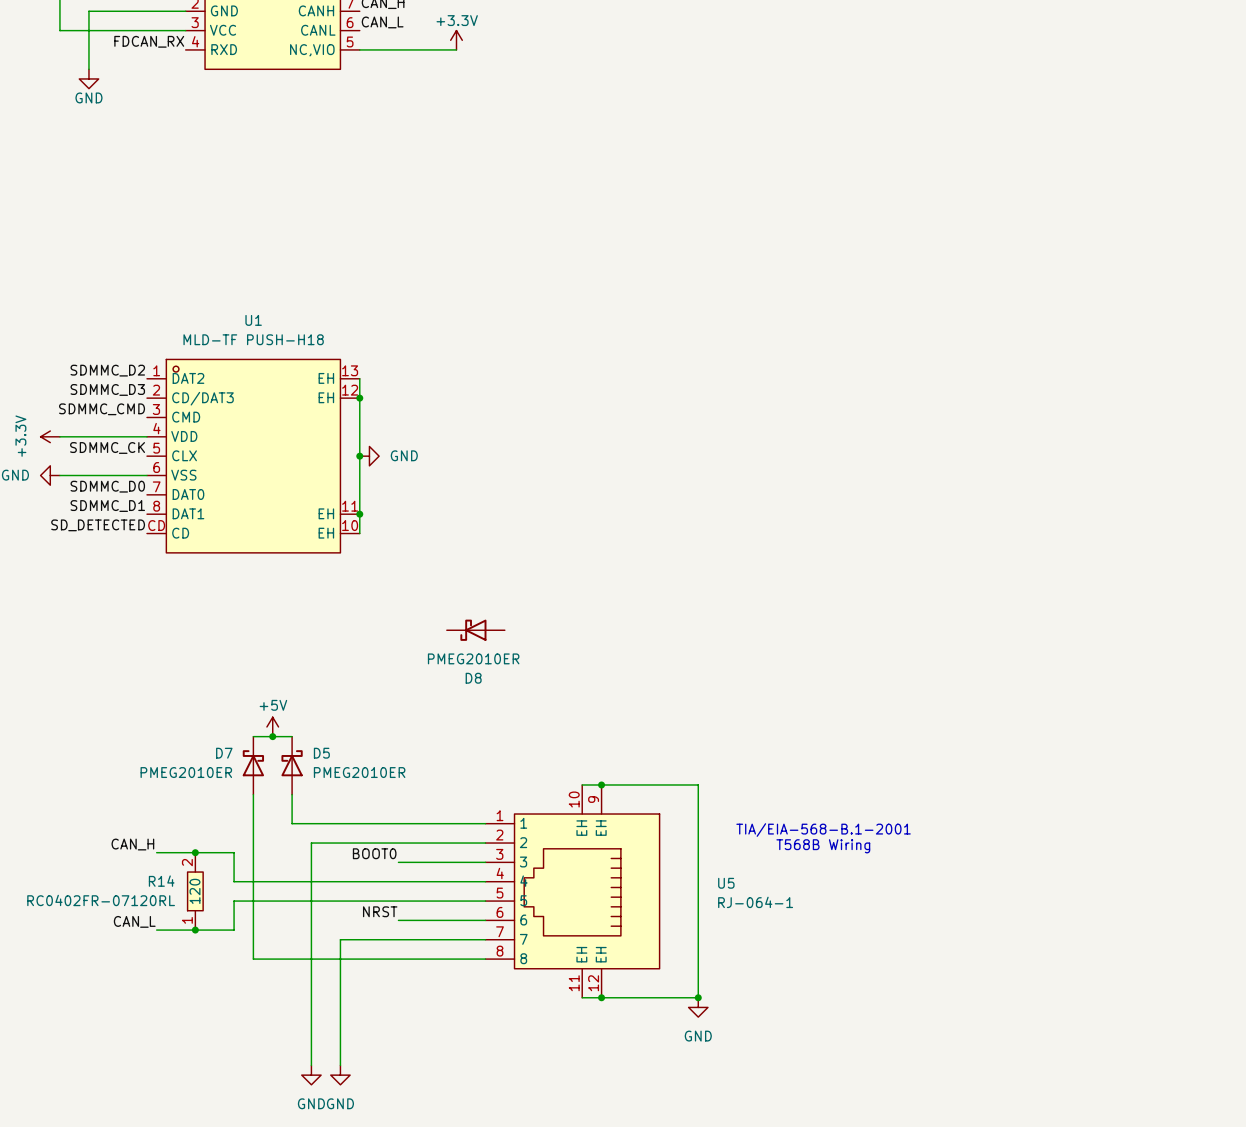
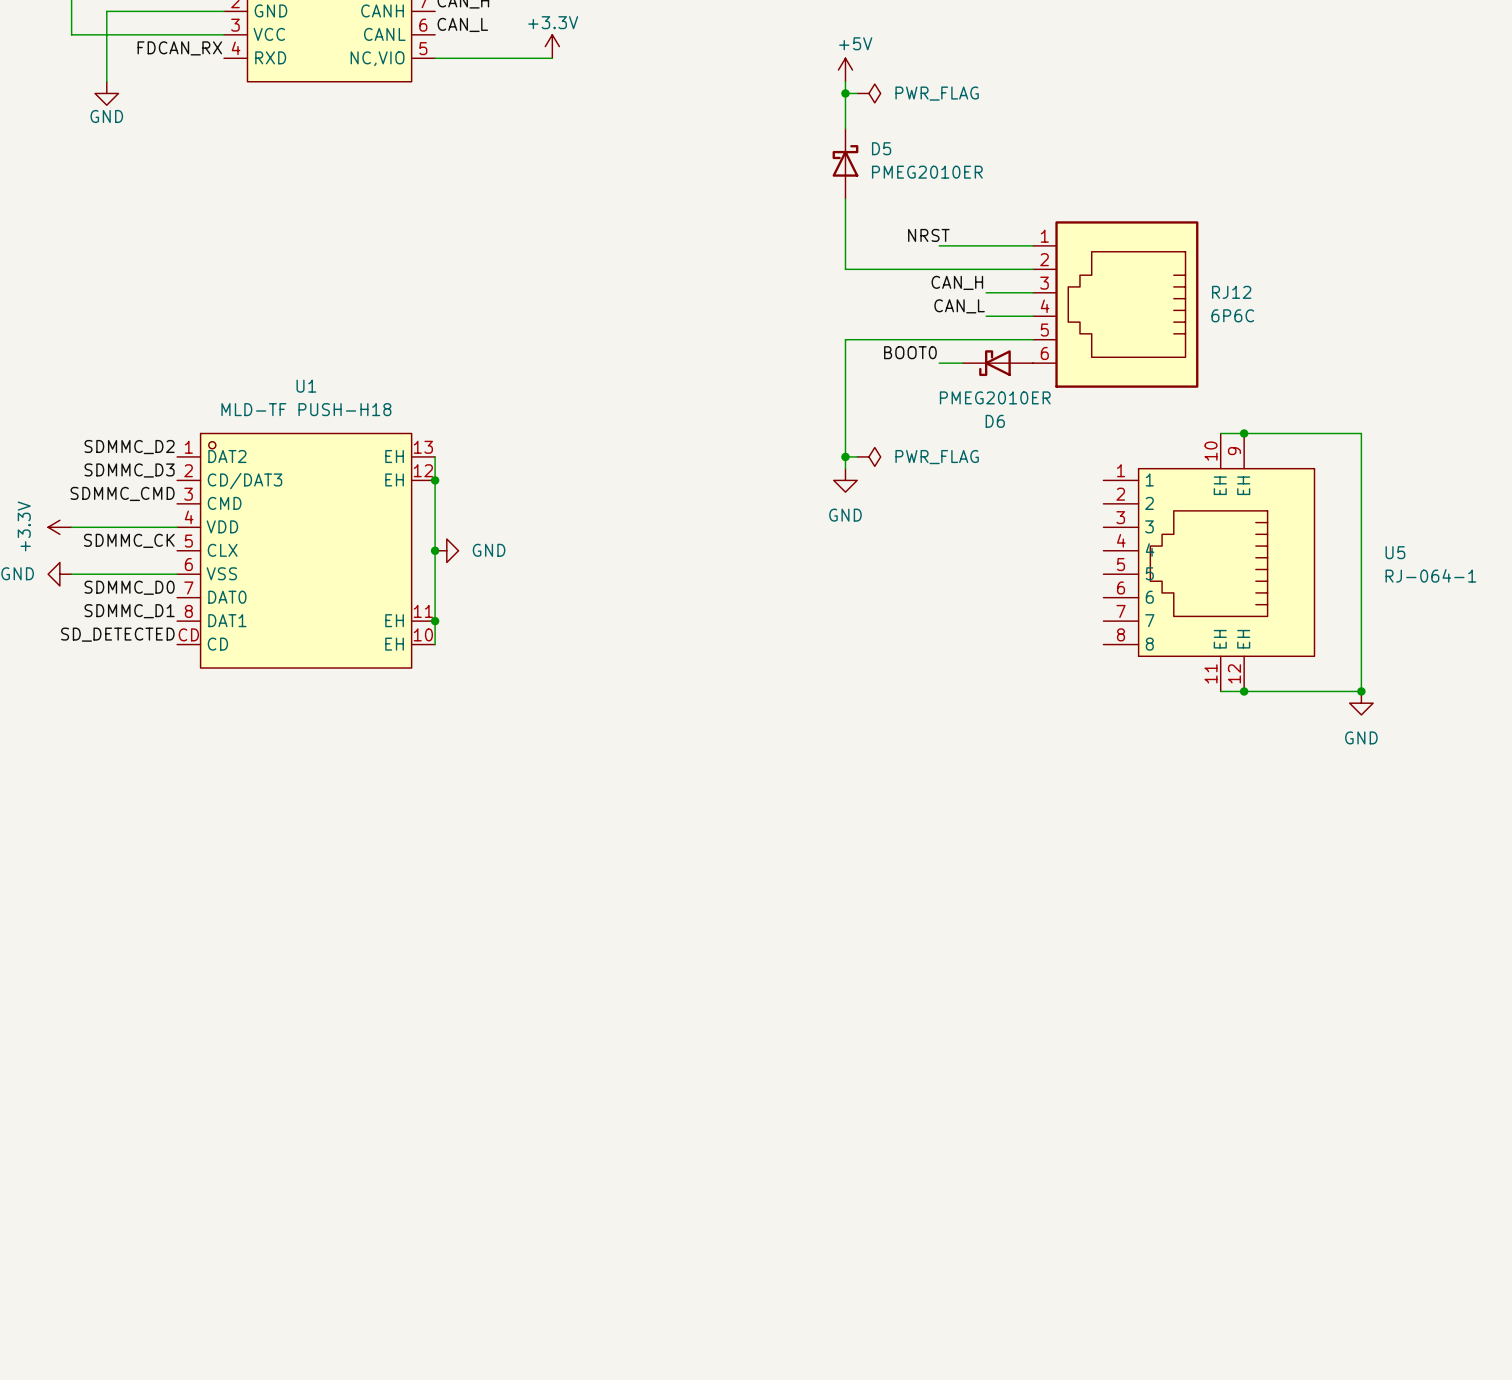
power symbol: none -> +5V (845, 70)
wire: none -> (845, 81) (845, 128)
wire: none -> (845, 93) (857, 93)
junction: none -> (845, 93)
power symbol: none -> PWR_FLAG (868, 93)
wire: none -> (845, 198) (845, 269) (1033, 269)
label: none -> NRST (928, 235)
wire: none -> (939, 245) (1033, 245)
label: none -> CAN_H (957, 282)
wire: none -> (986, 292) (1033, 292)
RJ12: none -> 6P6C (1115, 304)
label: none -> CAN_L (959, 306)
wire: none -> (986, 316) (1033, 316)
wire: none -> (1033, 339) (845, 339) (845, 468)
label: none -> BOOT0 (910, 352)
wire: none -> (939, 363) (962, 363)
D6: none -> PMEG2010ER (997, 363)
wire: none -> (1220, 433) (1361, 433) (1361, 691) (1220, 691)
junction: none -> (1244, 433)
wire: none -> (845, 456) (857, 456)
junction: none -> (845, 456)
power symbol: none -> PWR_FLAG (868, 456)
power symbol: none -> GND (845, 480)
junction: none -> (1244, 691)
junction: none -> (1361, 691)
power symbol: none -> GND (1361, 703)
D8: PMEG2010ER (475, 630) -> none
power symbol: +5V (272, 726) -> none
wire: (253, 736) (292, 736) -> none
junction: (272, 736) -> none
D7: PMEG2010ER (253, 765) -> none
D5 position: (292, 765) -> (845, 163)
wire: (582, 784) (698, 784) (698, 997) (582, 997) -> none
junction: (601, 784) -> none
wire: (253, 794) (253, 959) (485, 959) -> none
wire: (292, 794) (292, 823) (485, 823) -> none
text: TIA/EIA-568-B.1-2001 (823, 830) -> none
wire: (485, 843) (311, 843) (311, 1065) -> none
label: CAN_H (132, 844) -> none
text: T568B Wiring (823, 846) -> none
wire: (156, 852) (234, 852) (234, 881) (485, 881) -> none
junction: (195, 852) -> none
label: BOOT0 (374, 853) -> none
wire: (398, 862) (485, 862) -> none
R14: RC0402FR-07120RL (195, 891) -> none
U5 position: (572, 891) -> (1208, 562)
wire: (485, 901) (234, 901) (234, 930) (156, 930) -> none
label: NRST (380, 911) -> none
wire: (398, 920) (485, 920) -> none
label: CAN_L (134, 921) -> none
junction: (195, 930) -> none
wire: (485, 939) (340, 939) (340, 1065) -> none
junction: (601, 997) -> none
junction: (698, 997) -> none
power symbol: GND (698, 1007) -> none
power symbol: GND (311, 1075) -> none
power symbol: GND (340, 1075) -> none

